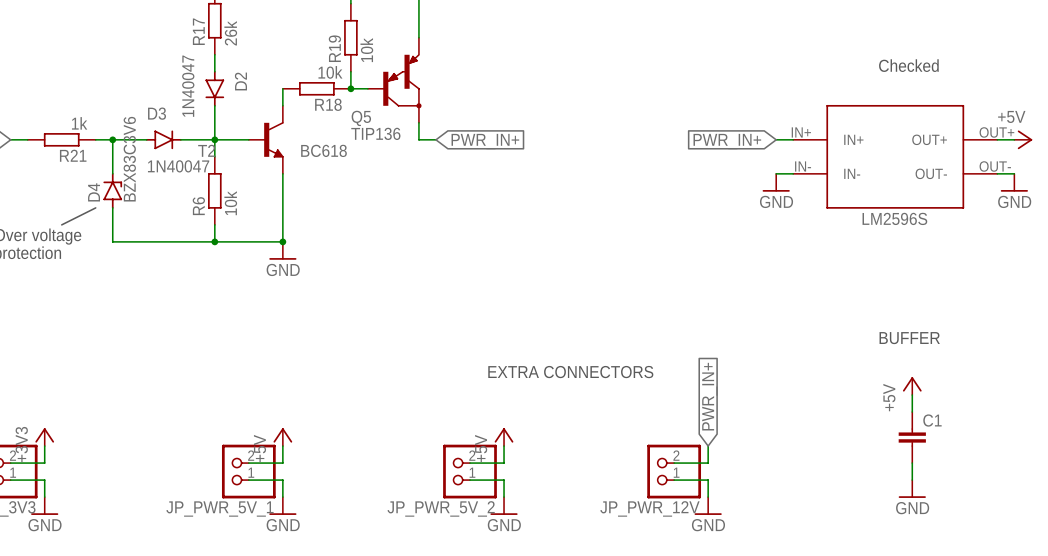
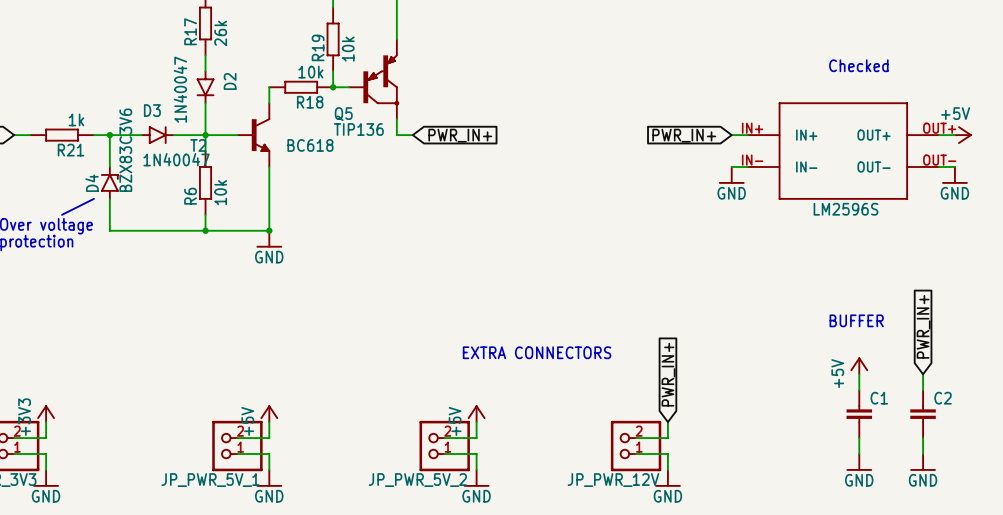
global label: none -> PWR_IN+ (923, 326)
wire: none -> (923, 374) (923, 390)
C2: none -> (923, 414)
wire: none -> (923, 438) (923, 454)
power symbol: none -> GND (923, 462)

